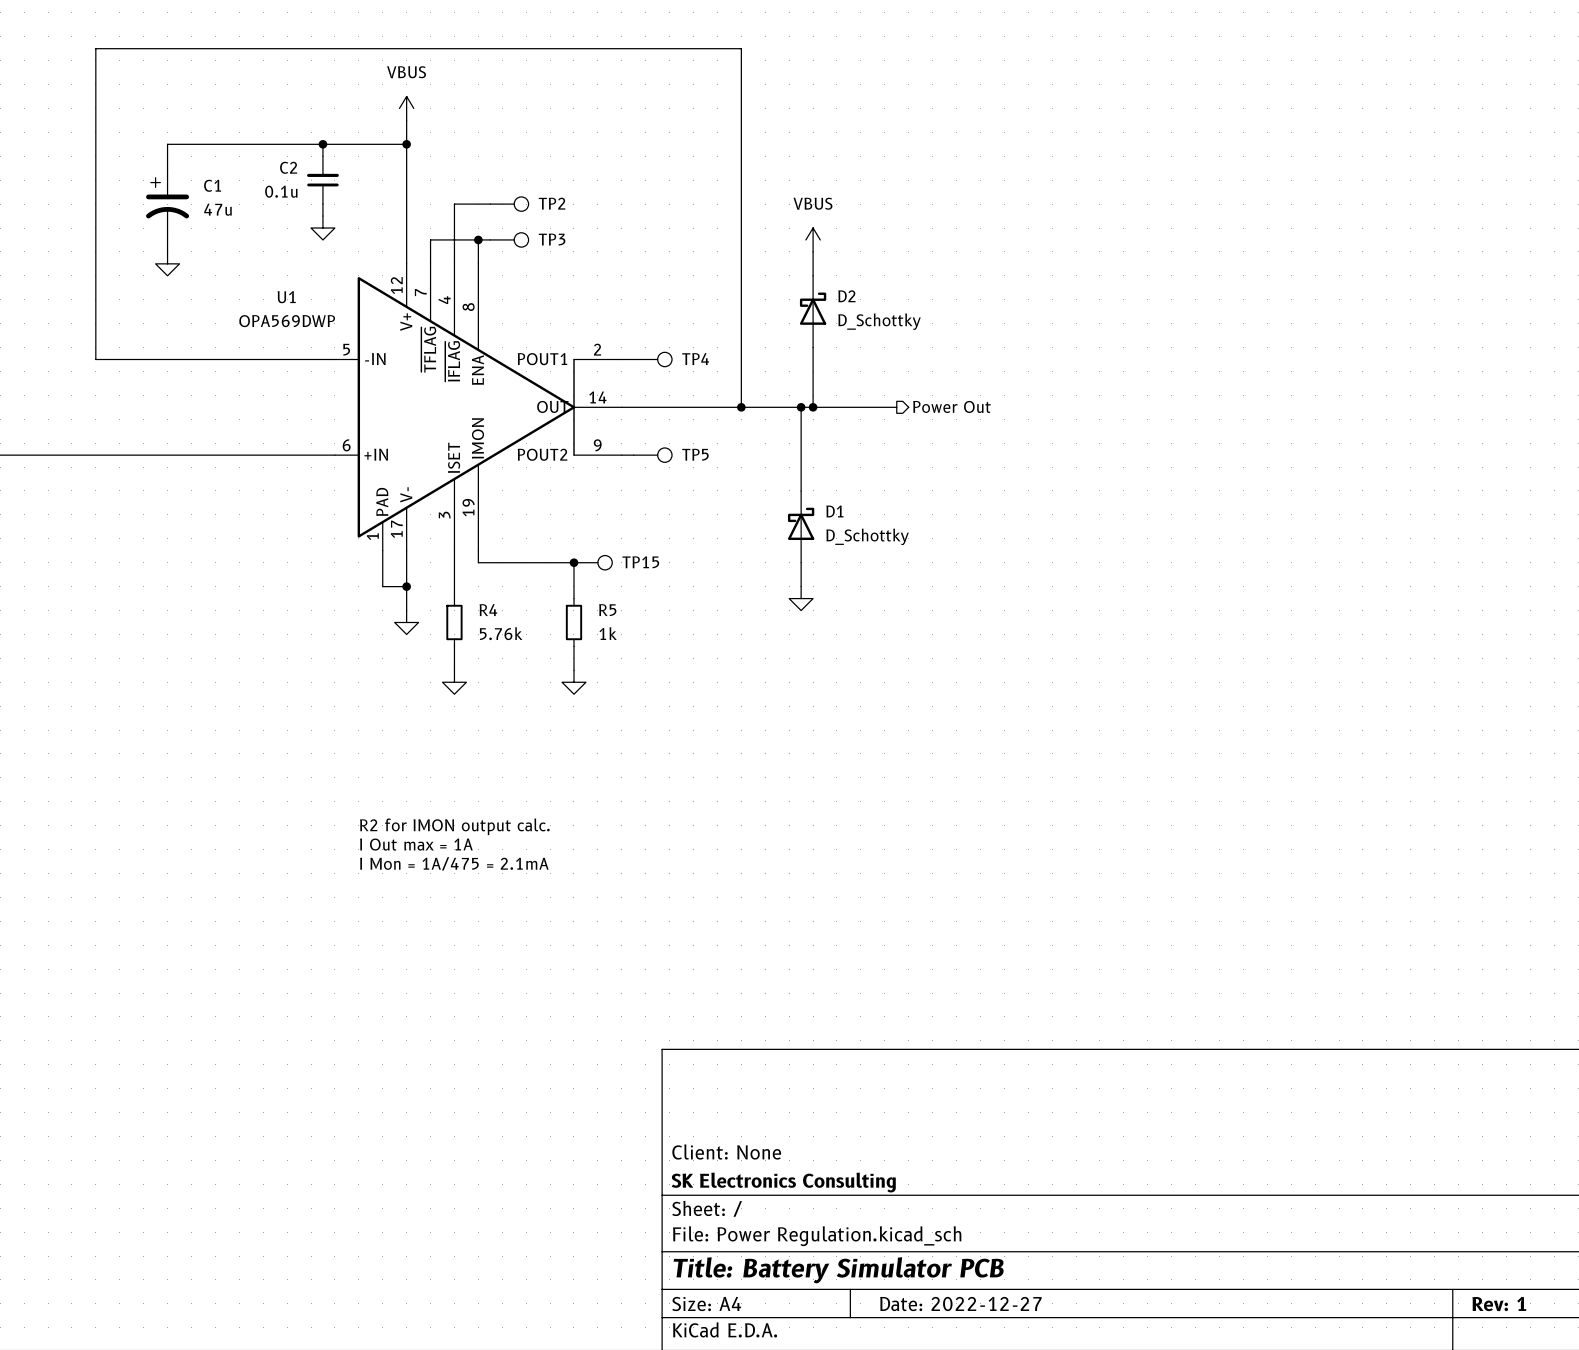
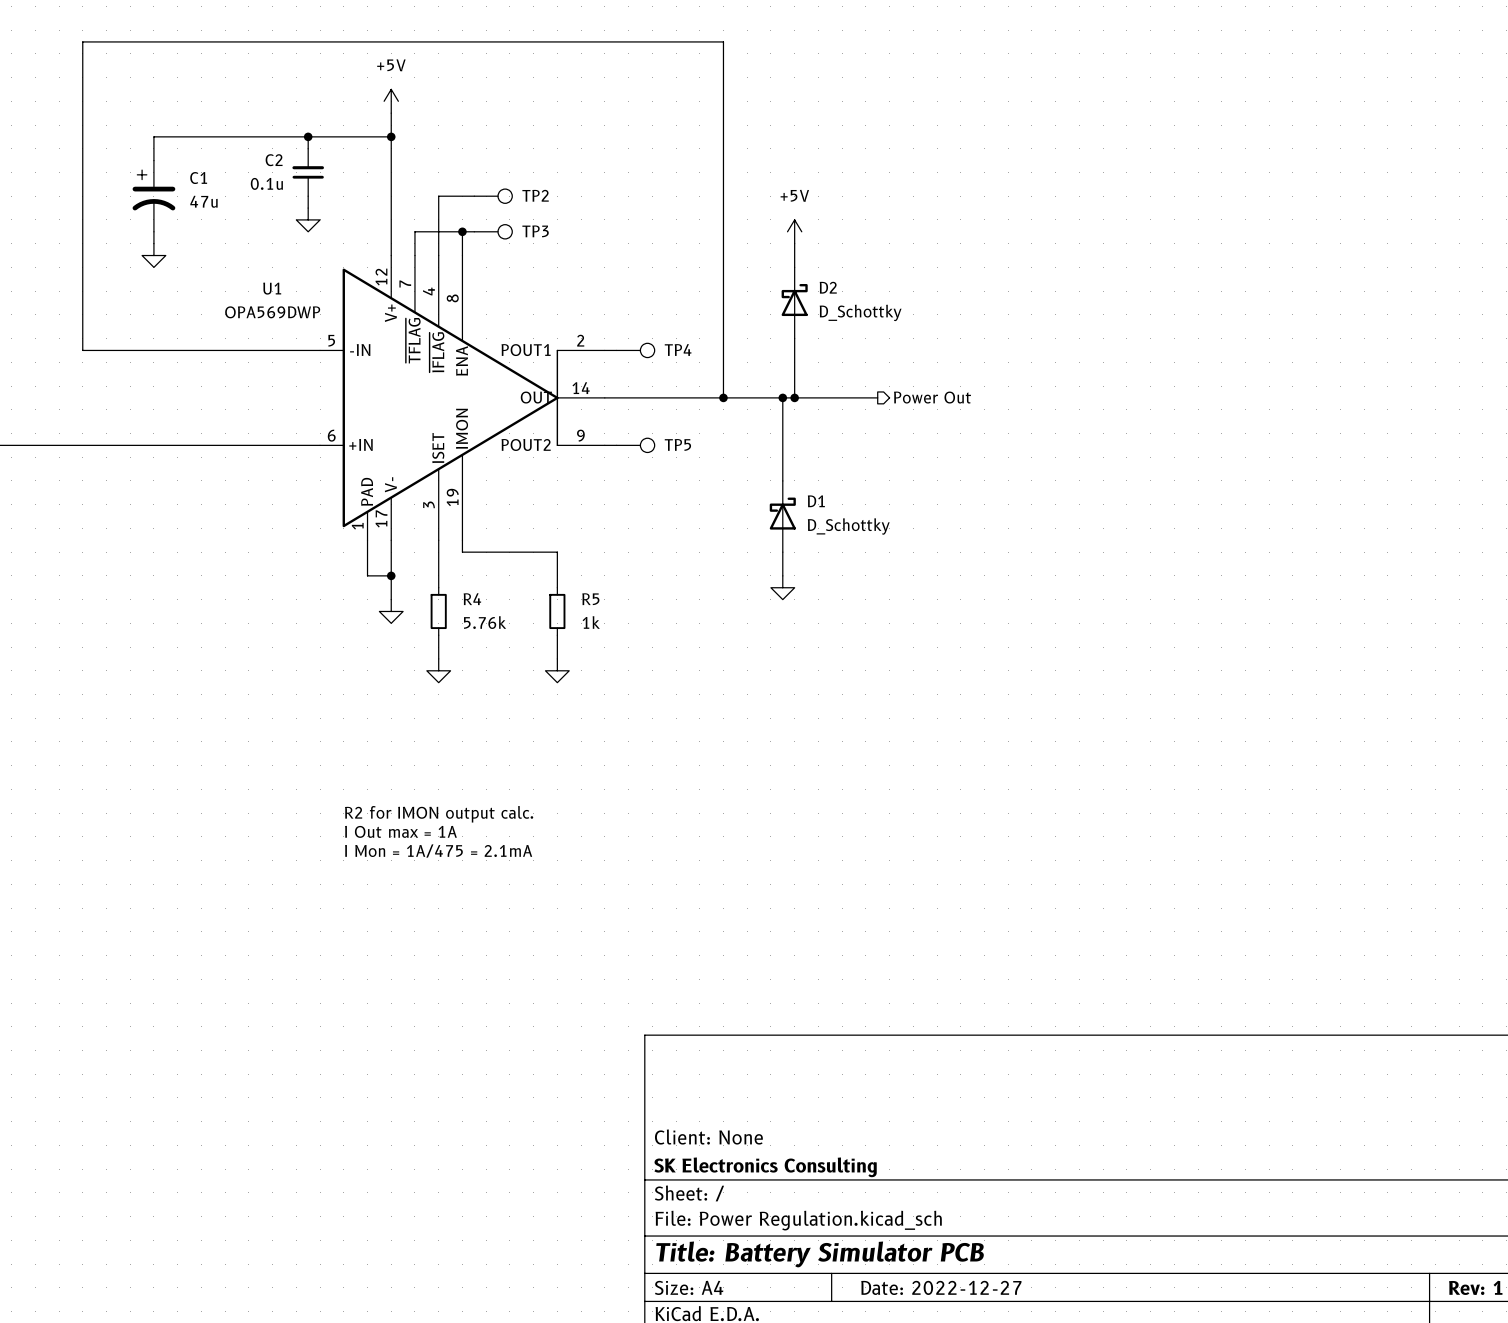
power symbol: VBUS (406, 108) -> +5V (391, 101)
power symbol: VBUS (813, 239) -> +5V (794, 231)
junction: (573, 562) -> none
TP15: (593, 562) -> none

